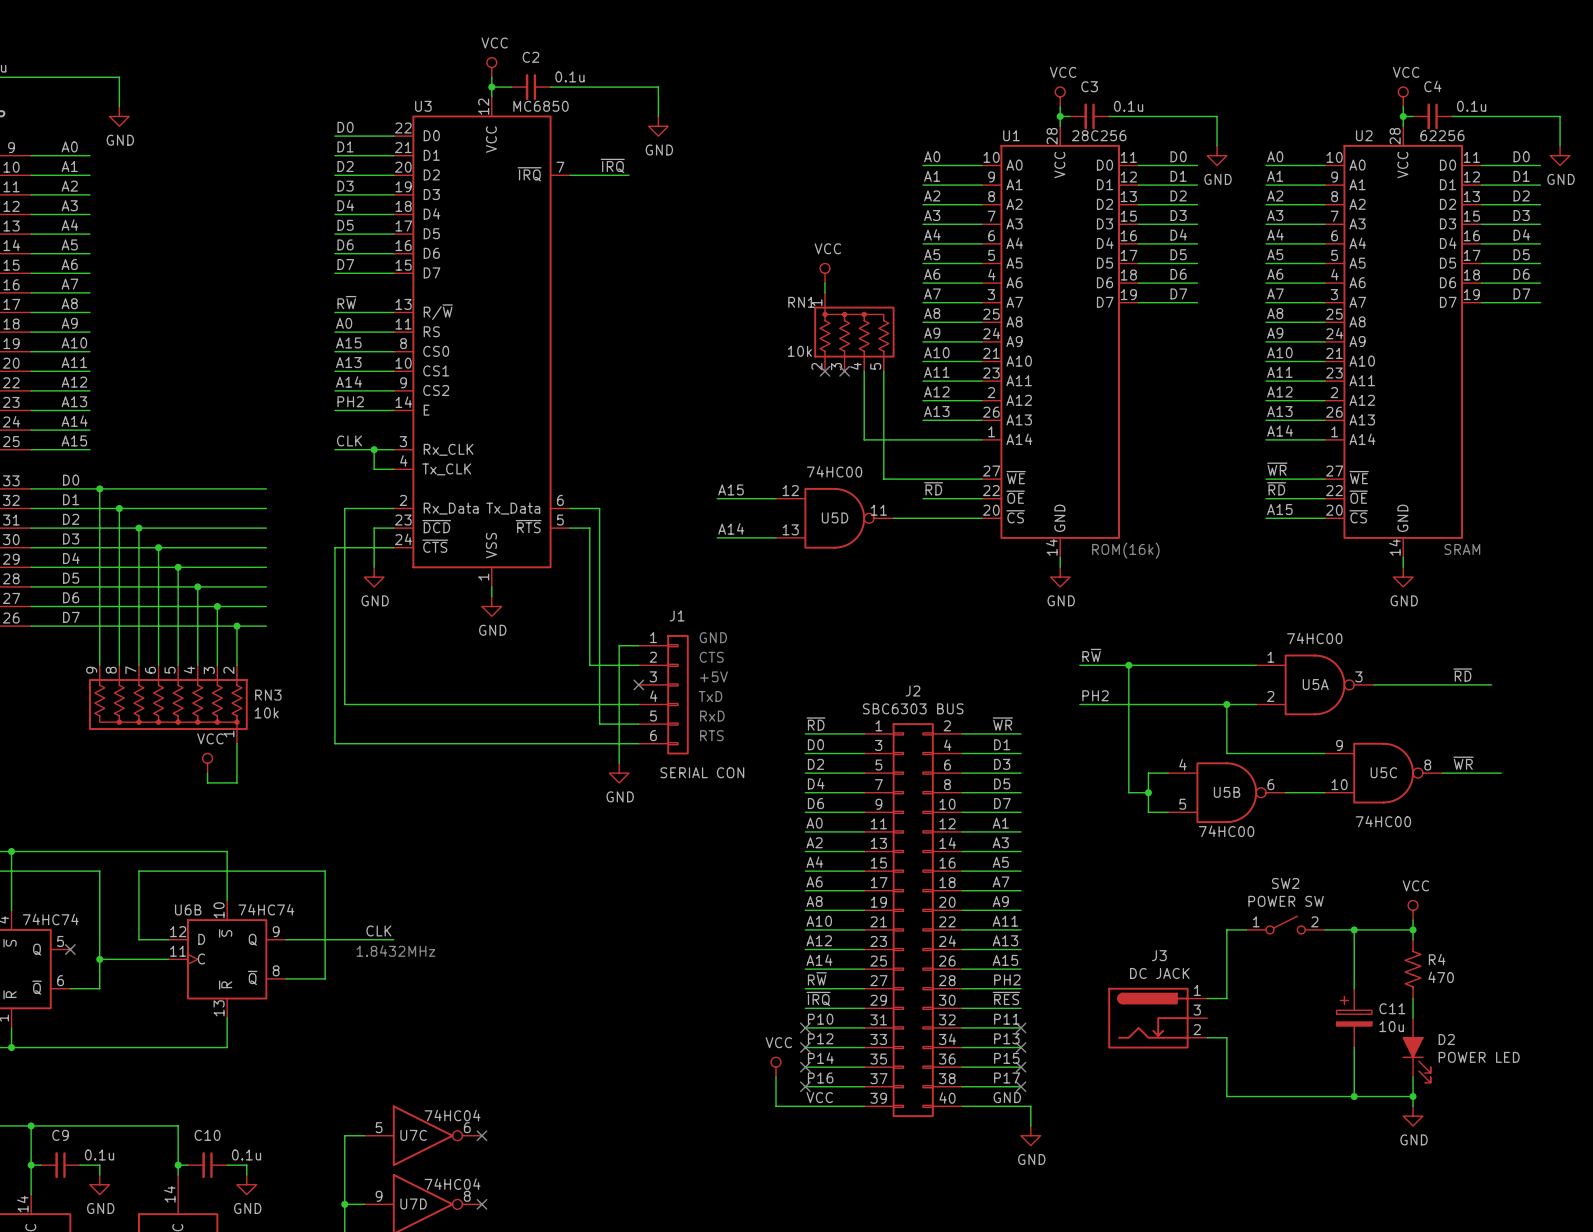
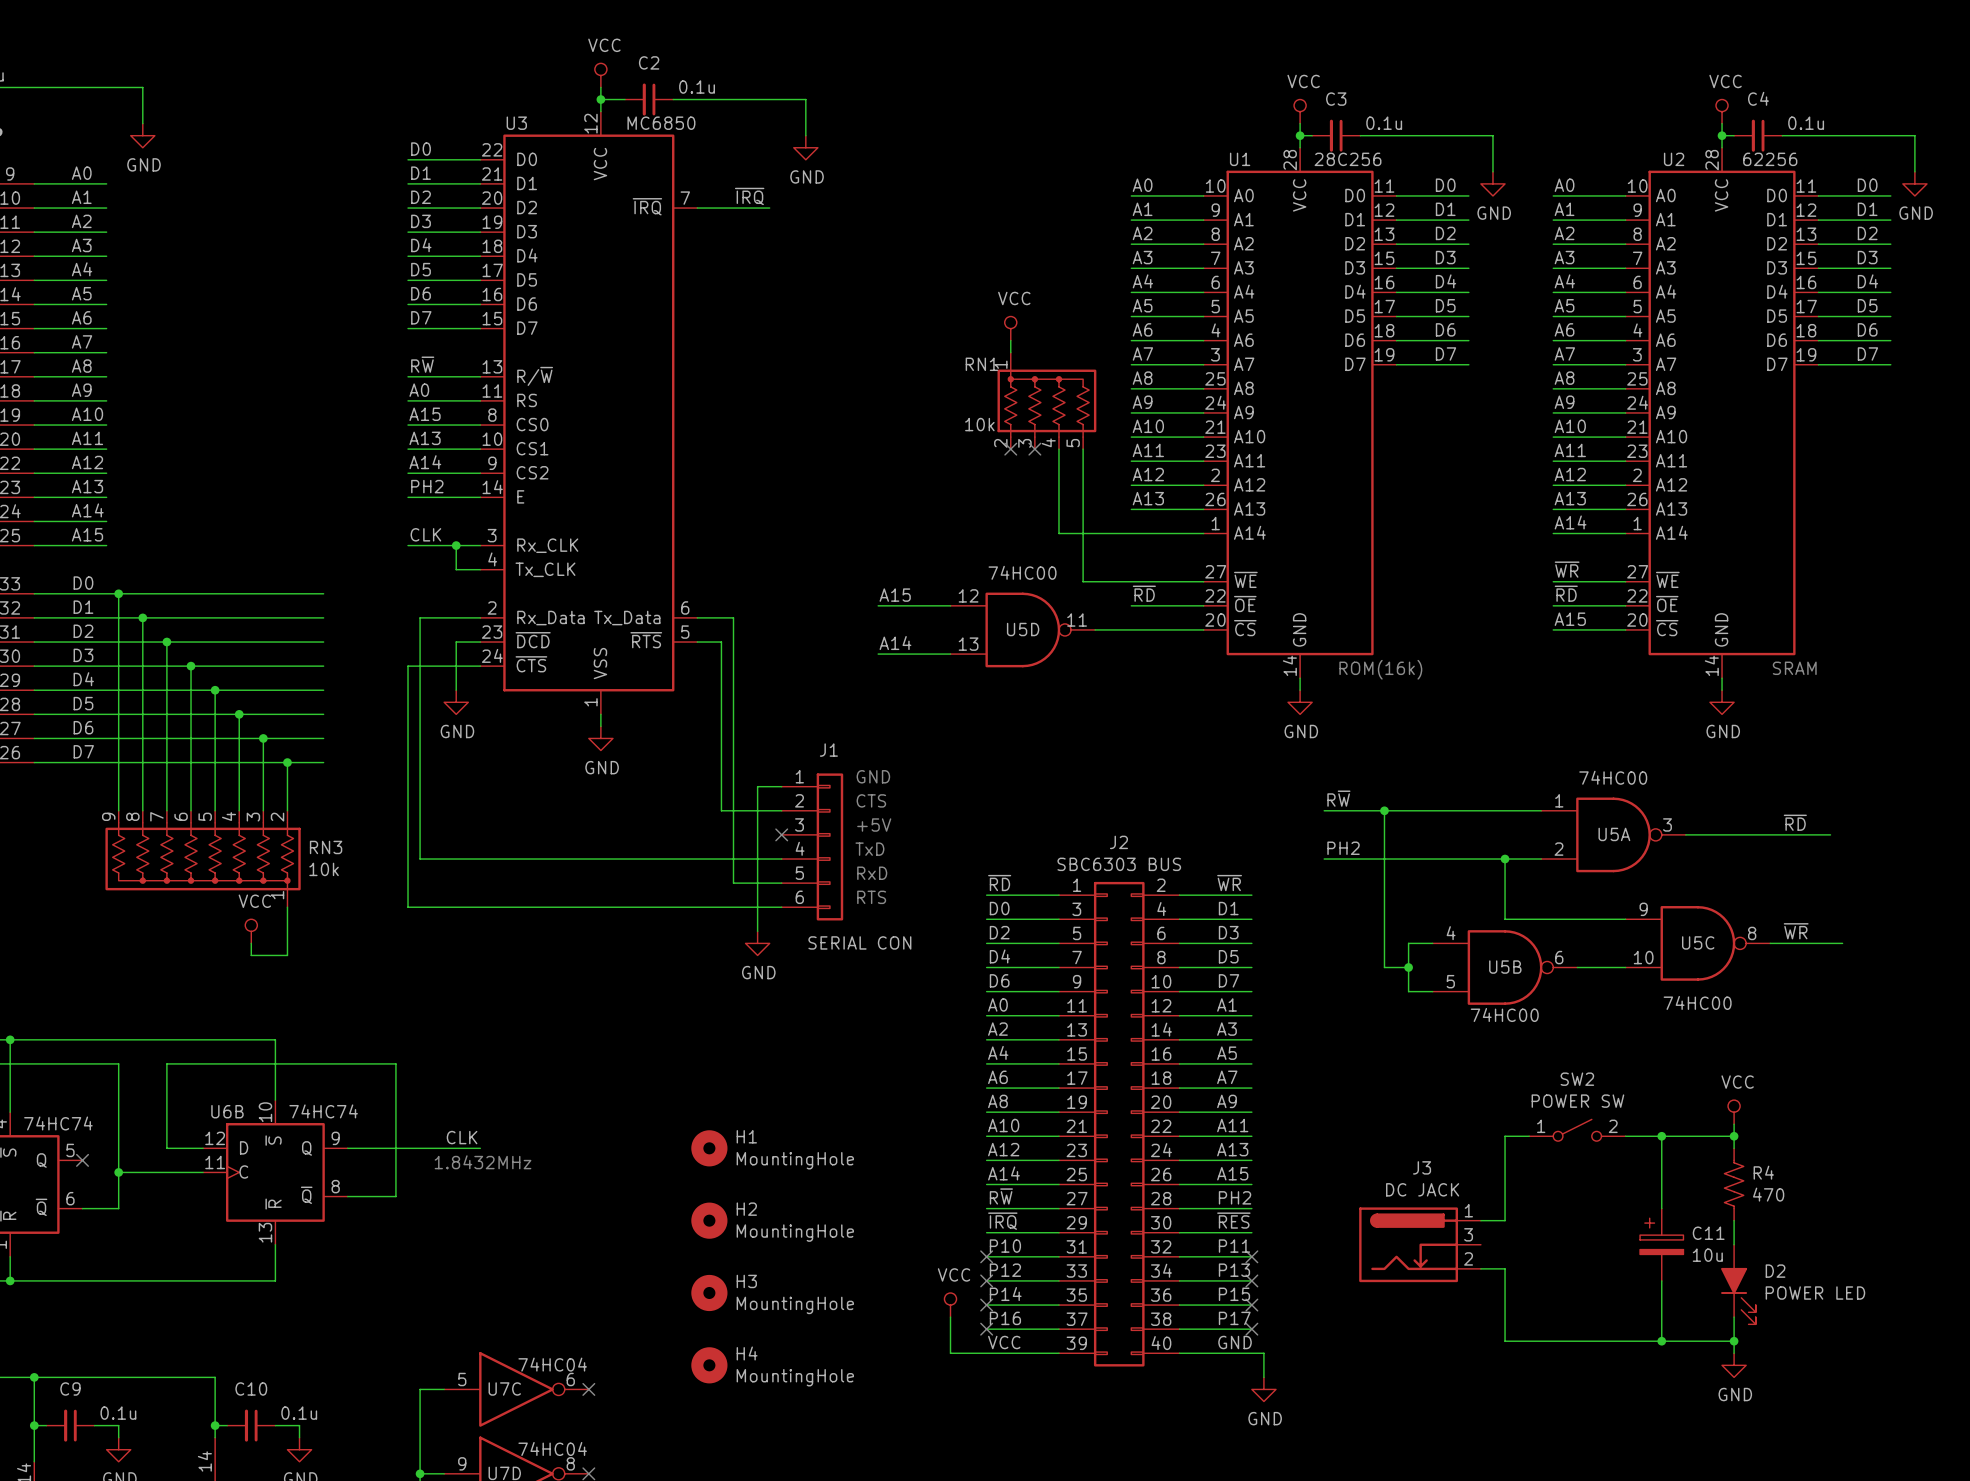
H1: none -> MountingHole (709, 1148)
H2: none -> MountingHole (709, 1220)
H3: none -> MountingHole (709, 1292)
H4: none -> MountingHole (709, 1365)

